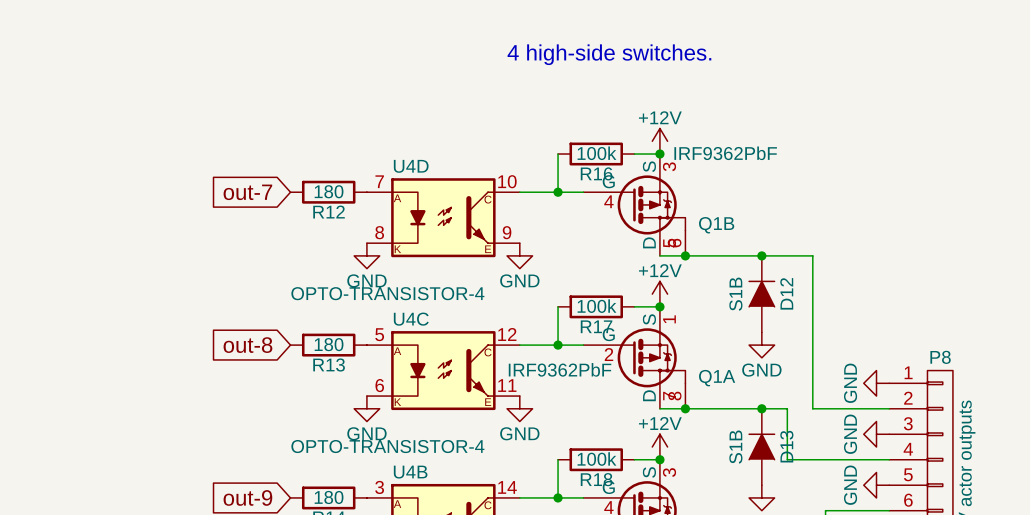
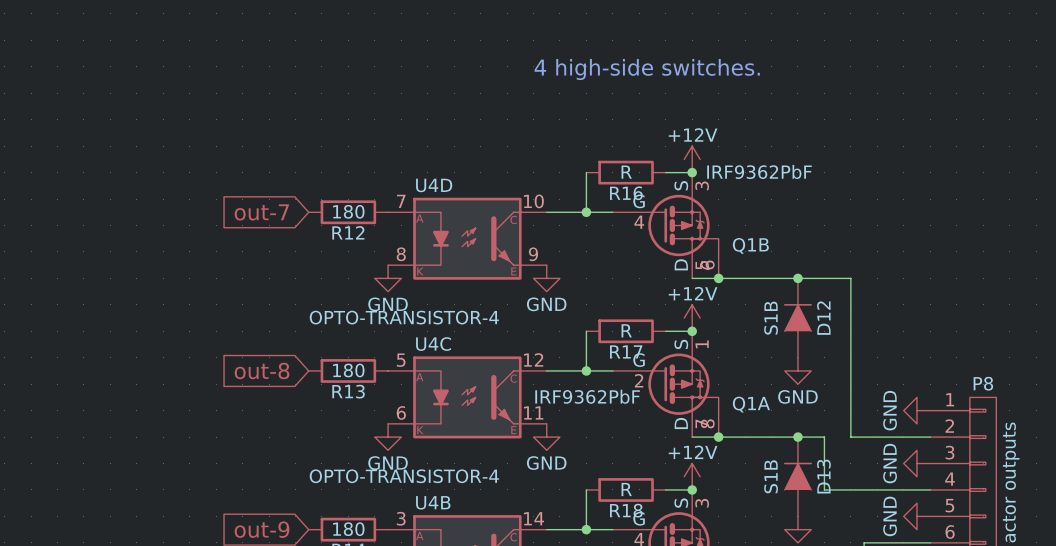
R16 value: 100k (596, 153) -> R (626, 172)
R17 value: 100k (596, 306) -> R (626, 330)
R18 value: 100k (596, 459) -> R (626, 489)

